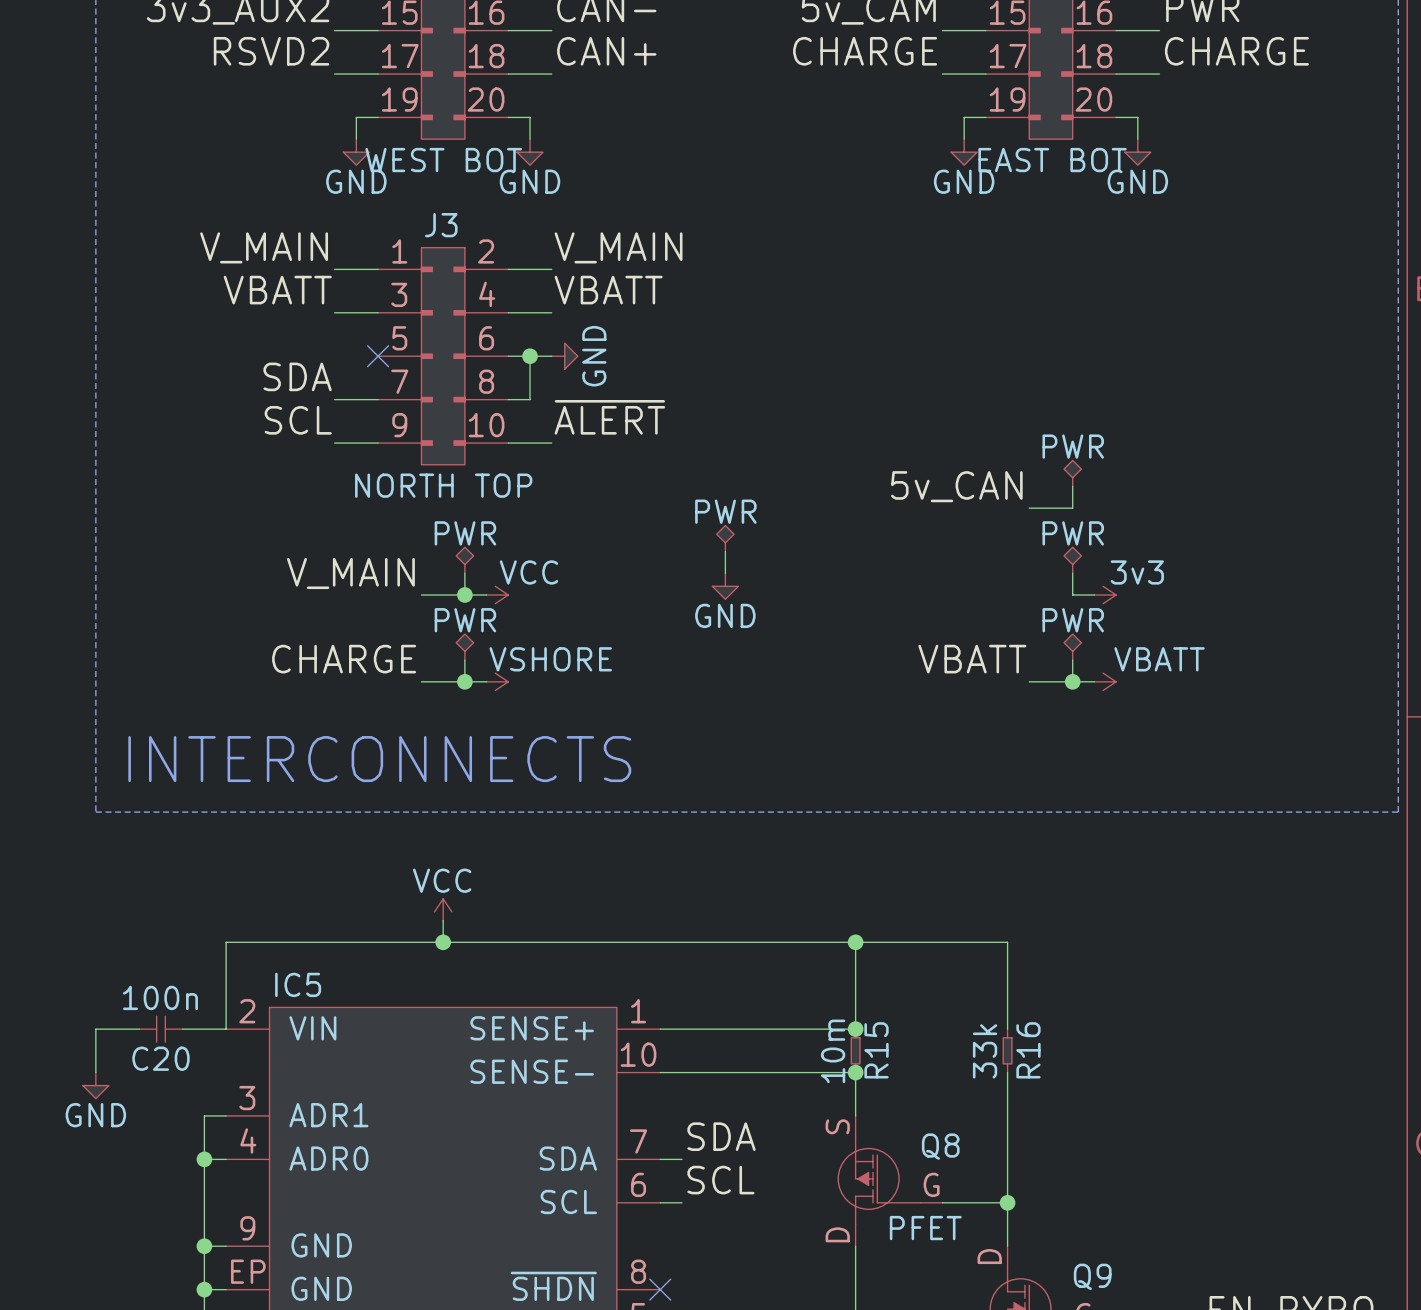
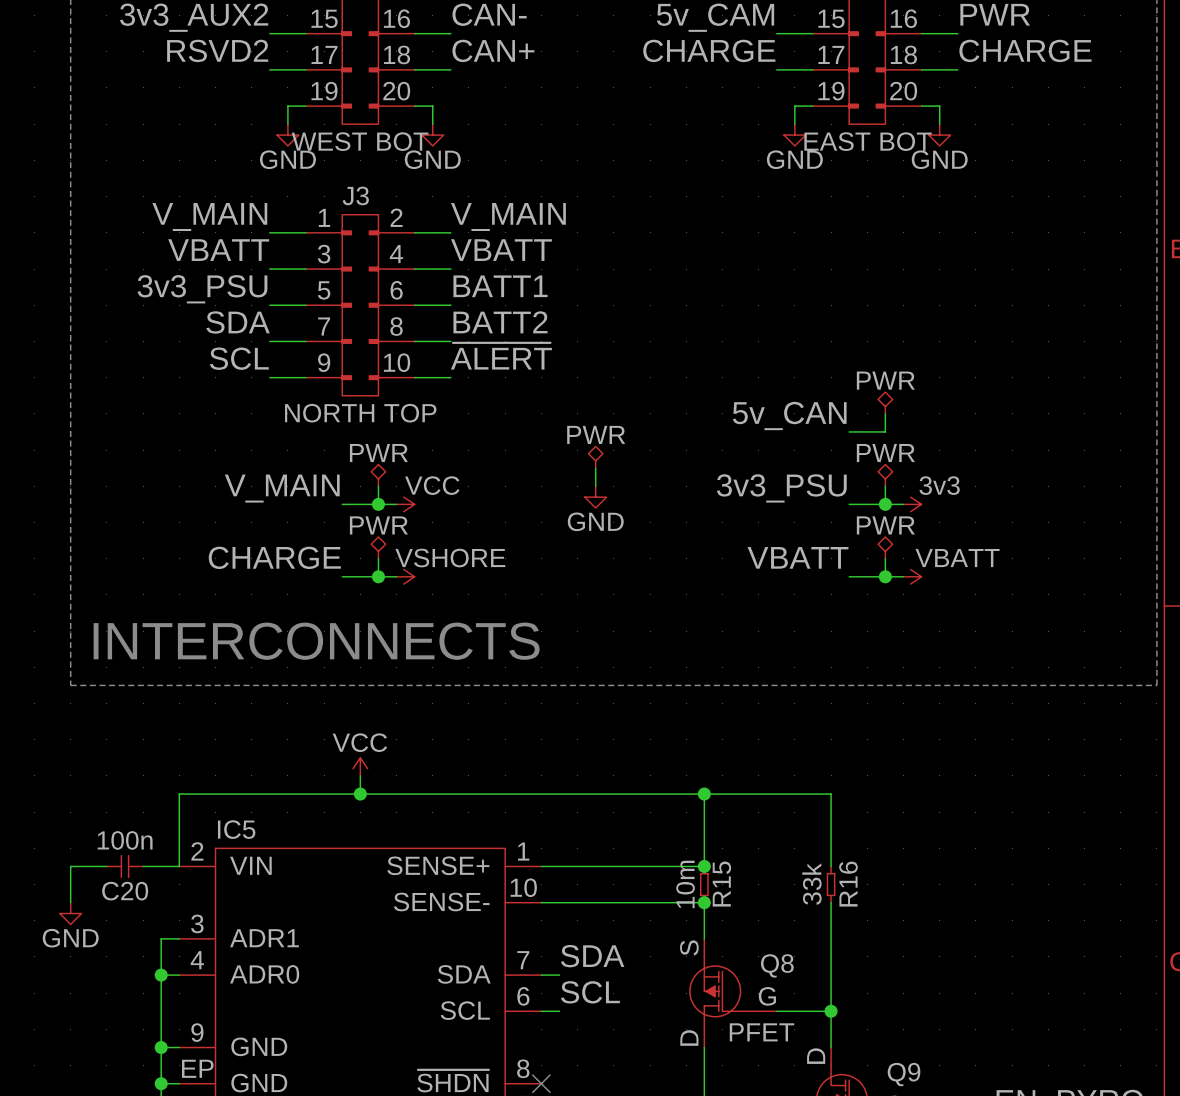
label: none -> BATT1 (500, 286)
label: none -> 3v3_PSU (202, 289)
wire: none -> (269, 305) (306, 305)
no-connect mark: (378, 356) -> none
wire: (530, 356) (530, 399) -> (450, 341) (432, 341)
junction: (530, 356) -> none
power symbol: GND (564, 356) -> none
label: none -> BATT2 (500, 322)
label: none -> 3v3_PSU (781, 488)
wire: none -> (849, 504) (885, 504)
junction: none -> (885, 504)

